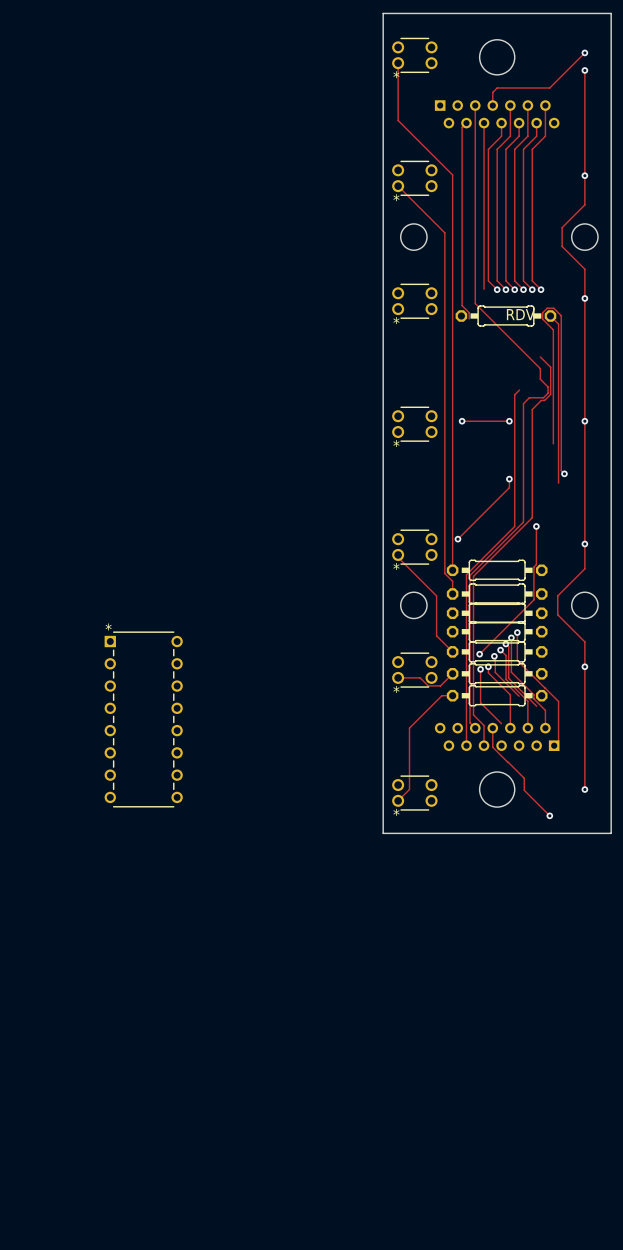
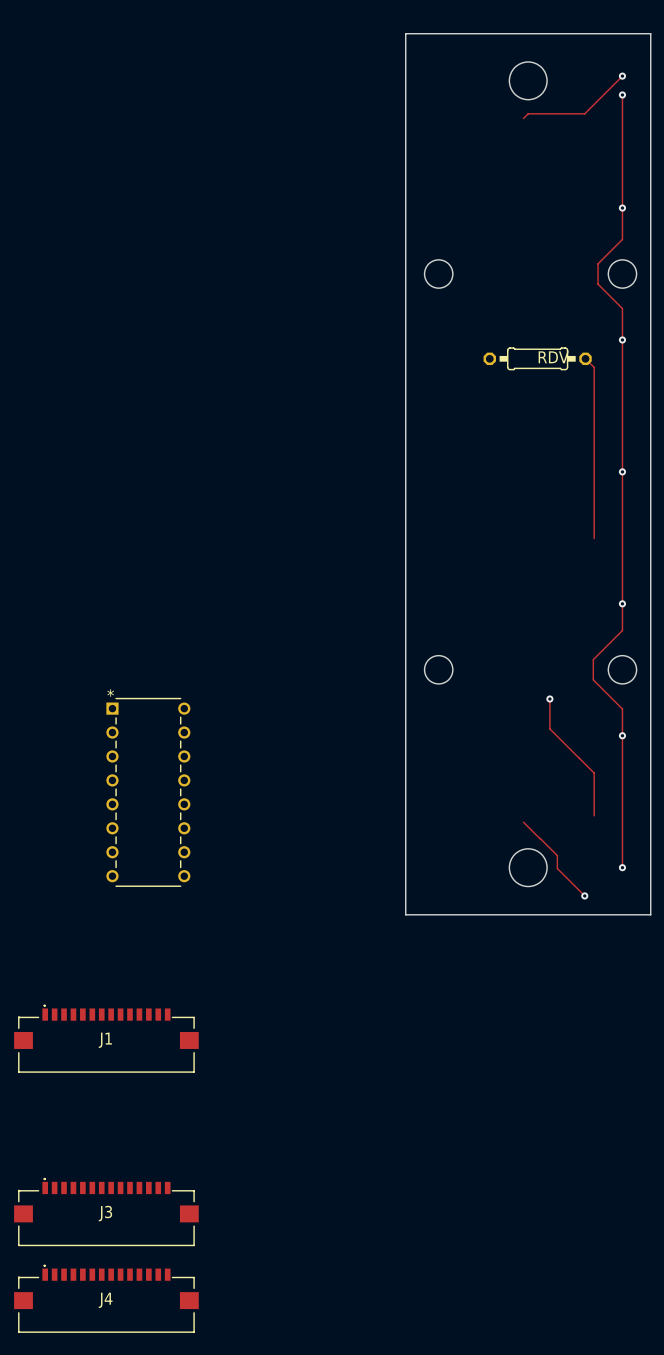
part: (414, 55) -> none
track: (398, 63) (398, 120) (452, 174) (452, 570) -> none
track: (492, 92) (492, 105) -> none
track: (475, 105) (475, 303) (540, 368) (540, 379) (548, 386) (548, 393) (543, 397) (529, 397) (523, 403) (523, 522) (470, 575) (470, 722) (475, 728) -> none
track: (510, 105) (510, 136) (497, 149) (497, 280) (505, 289) -> none
track: (527, 105) (527, 136) (514, 149) (514, 280) (523, 289) -> none
track: (545, 105) (545, 136) (532, 149) (532, 280) (541, 289) -> none
part: (497, 114) -> none
track: (466, 123) (462, 127) (462, 305) (469, 312) (469, 318) -> none
track: (484, 123) (484, 289) -> none
track: (501, 123) (501, 136) (488, 149) (488, 280) (497, 289) -> none
track: (519, 123) (519, 136) (505, 149) (505, 280) (514, 289) -> none
track: (536, 123) (536, 136) (523, 149) (523, 280) (532, 289) -> none
part: (414, 178) -> none
track: (398, 186) (444, 232) (444, 573) (452, 581) (452, 593) -> none
via: (497, 289) -> none
via: (505, 289) -> none
via: (514, 289) -> none
via: (523, 289) -> none
via: (532, 289) -> none
via: (541, 289) -> none
part: (414, 301) -> none
track: (540, 356) (550, 367) (550, 394) (532, 409) (532, 517) (473, 576) (473, 714) (484, 725) (484, 745) -> none
track: (519, 390) (514, 394) (514, 526) (466, 574) (466, 745) -> none
track: (462, 421) (509, 421) -> none
via: (462, 421) -> none
via: (509, 421) -> none
part: (414, 424) -> none
track: (553, 443) (553, 329) (542, 319) (542, 312) (547, 308) (553, 308) (561, 315) (561, 470) (564, 473) -> none
via: (564, 473) -> none
track: (509, 479) (509, 487) (457, 539) -> none
via: (509, 479) -> none
track: (536, 526) (533, 599) (479, 654) -> none
via: (536, 526) -> none
via: (457, 539) -> none
part: (414, 547) -> none
track: (398, 554) (398, 557) (436, 595) (436, 635) (452, 651) -> none
part: (497, 570) -> none
part: (497, 593) -> none
part: (497, 613) -> none
part: (497, 631) -> none
track: (511, 637) (511, 672) (533, 694) (533, 698) (545, 710) (545, 728) -> none
via: (511, 637) -> none
track: (505, 643) (508, 646) (508, 678) (536, 706) -> none
via: (505, 643) -> none
track: (500, 650) (506, 655) (506, 679) (527, 701) (527, 728) -> none
via: (500, 650) -> none
part: (497, 651) -> none
via: (479, 654) -> none
track: (494, 656) (495, 672) (519, 696) -> none
via: (494, 656) -> none
track: (488, 666) (488, 672) (510, 694) (510, 728) -> none
via: (488, 666) -> none
track: (480, 669) (480, 702) (501, 723) -> none
via: (480, 669) -> none
part: (414, 670) -> none
track: (452, 673) (440, 685) (428, 685) (420, 677) (398, 677) -> none
part: (497, 673) -> none
track: (452, 695) (441, 695) (409, 728) (409, 789) (398, 800) -> none
part: (497, 695) -> none
track: (492, 728) (492, 747) -> none
part: (497, 736) -> none
part: (414, 793) -> none
J1: none -> (106, 1038)
J3: none -> (106, 1212)
J4: none -> (106, 1298)

